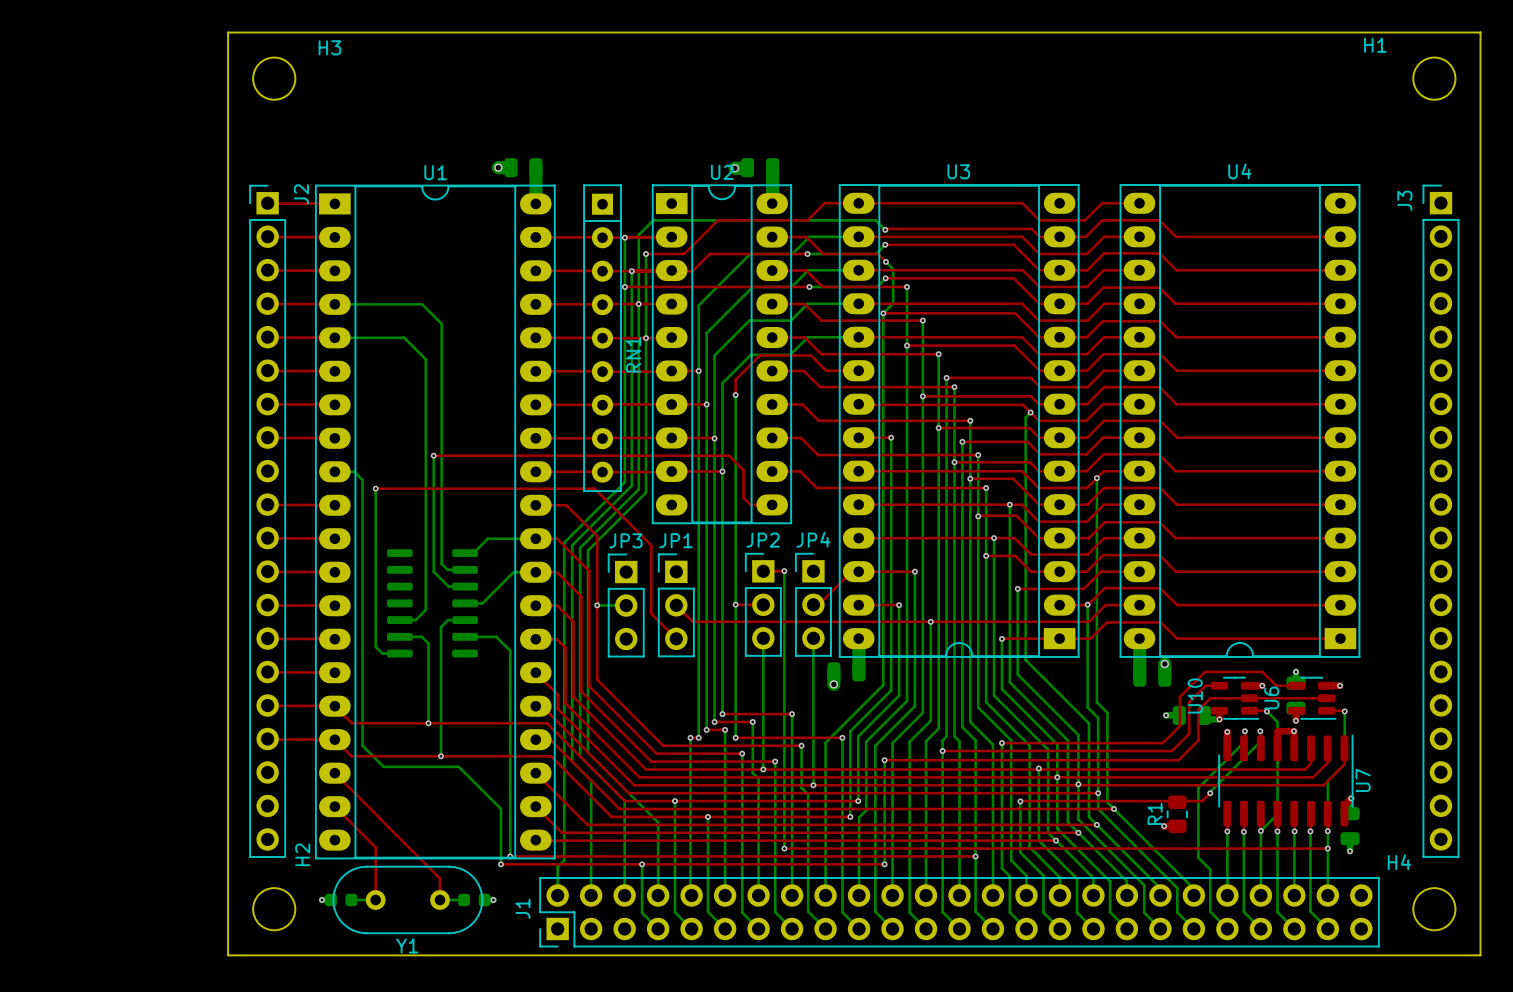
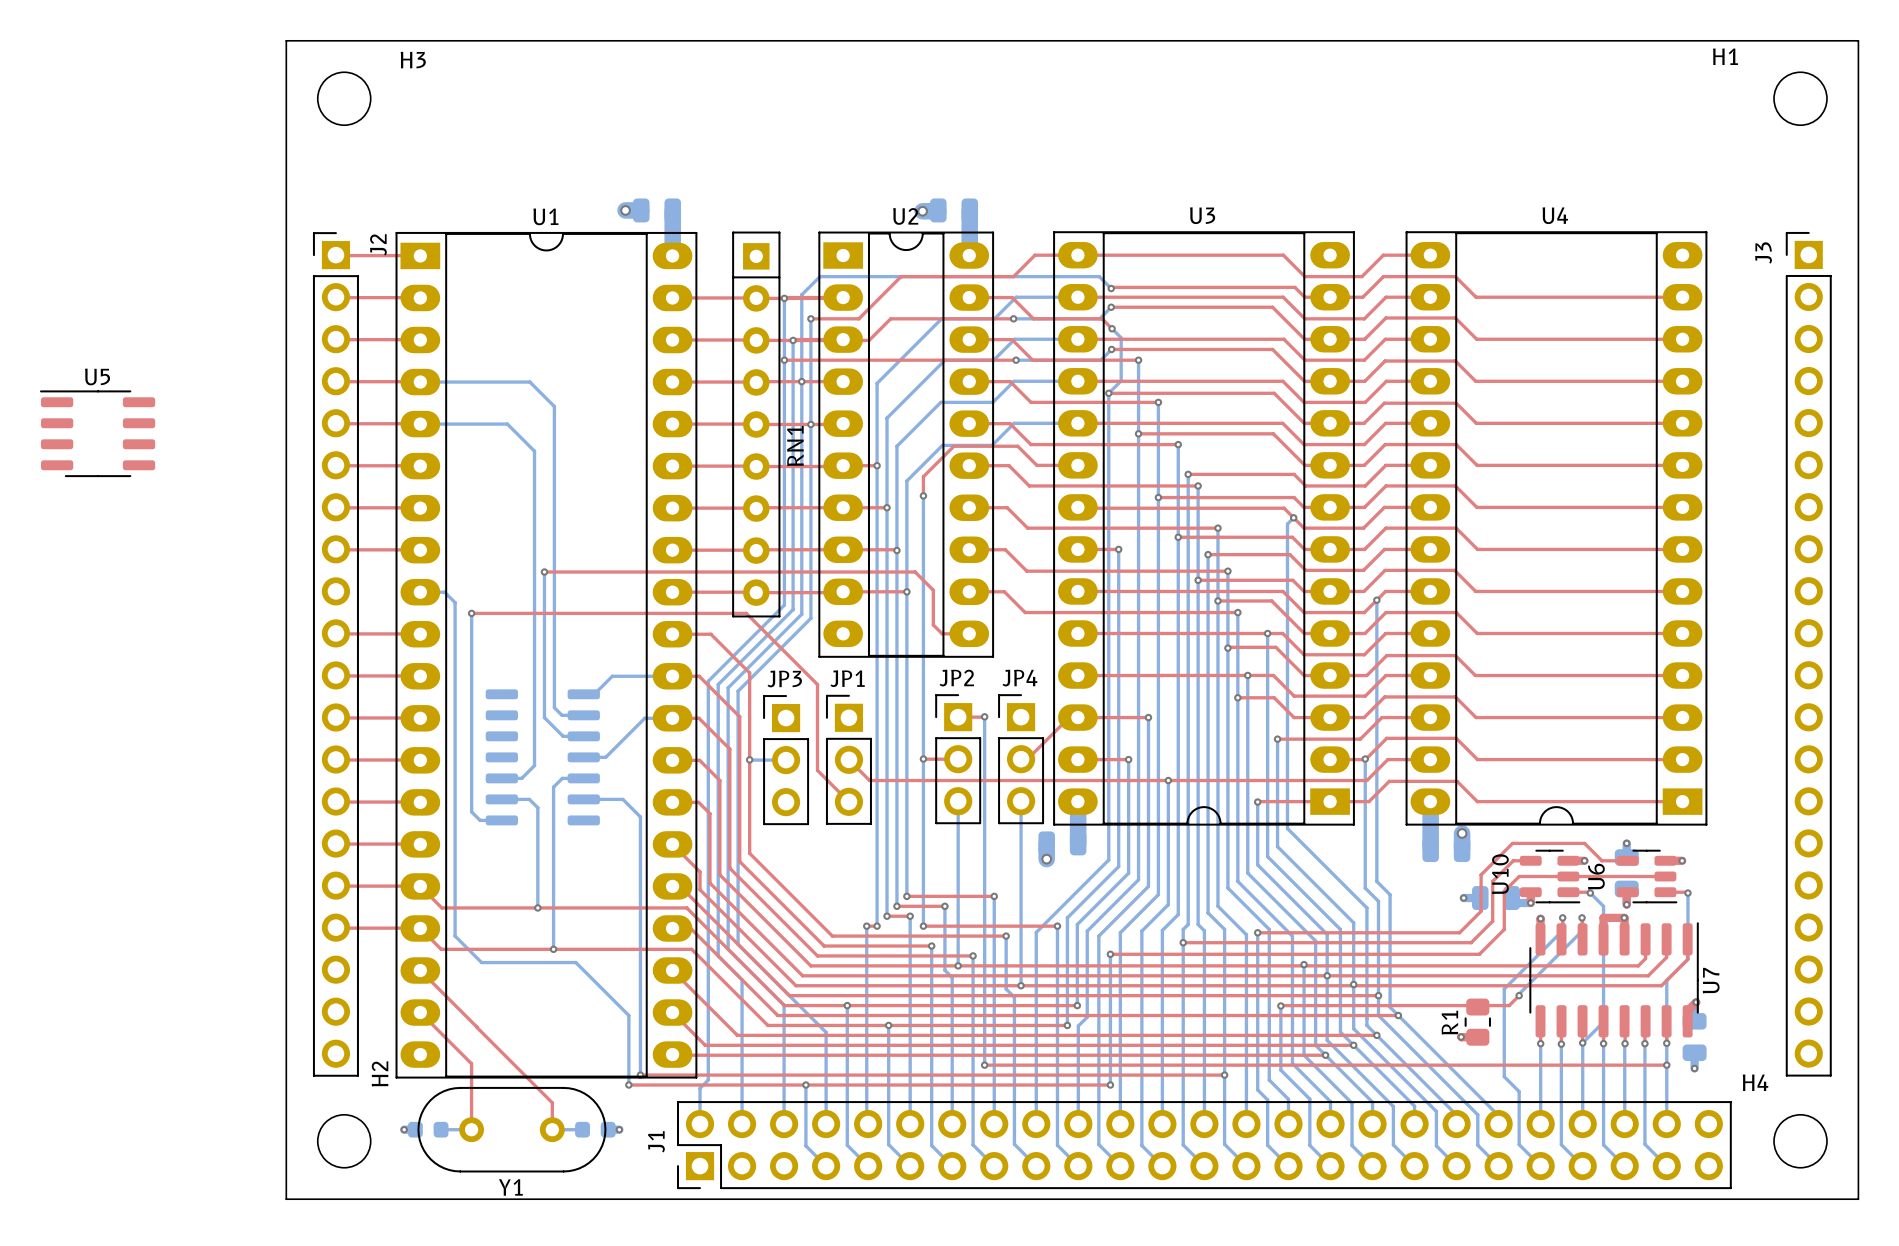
U5: none -> (97, 433)

